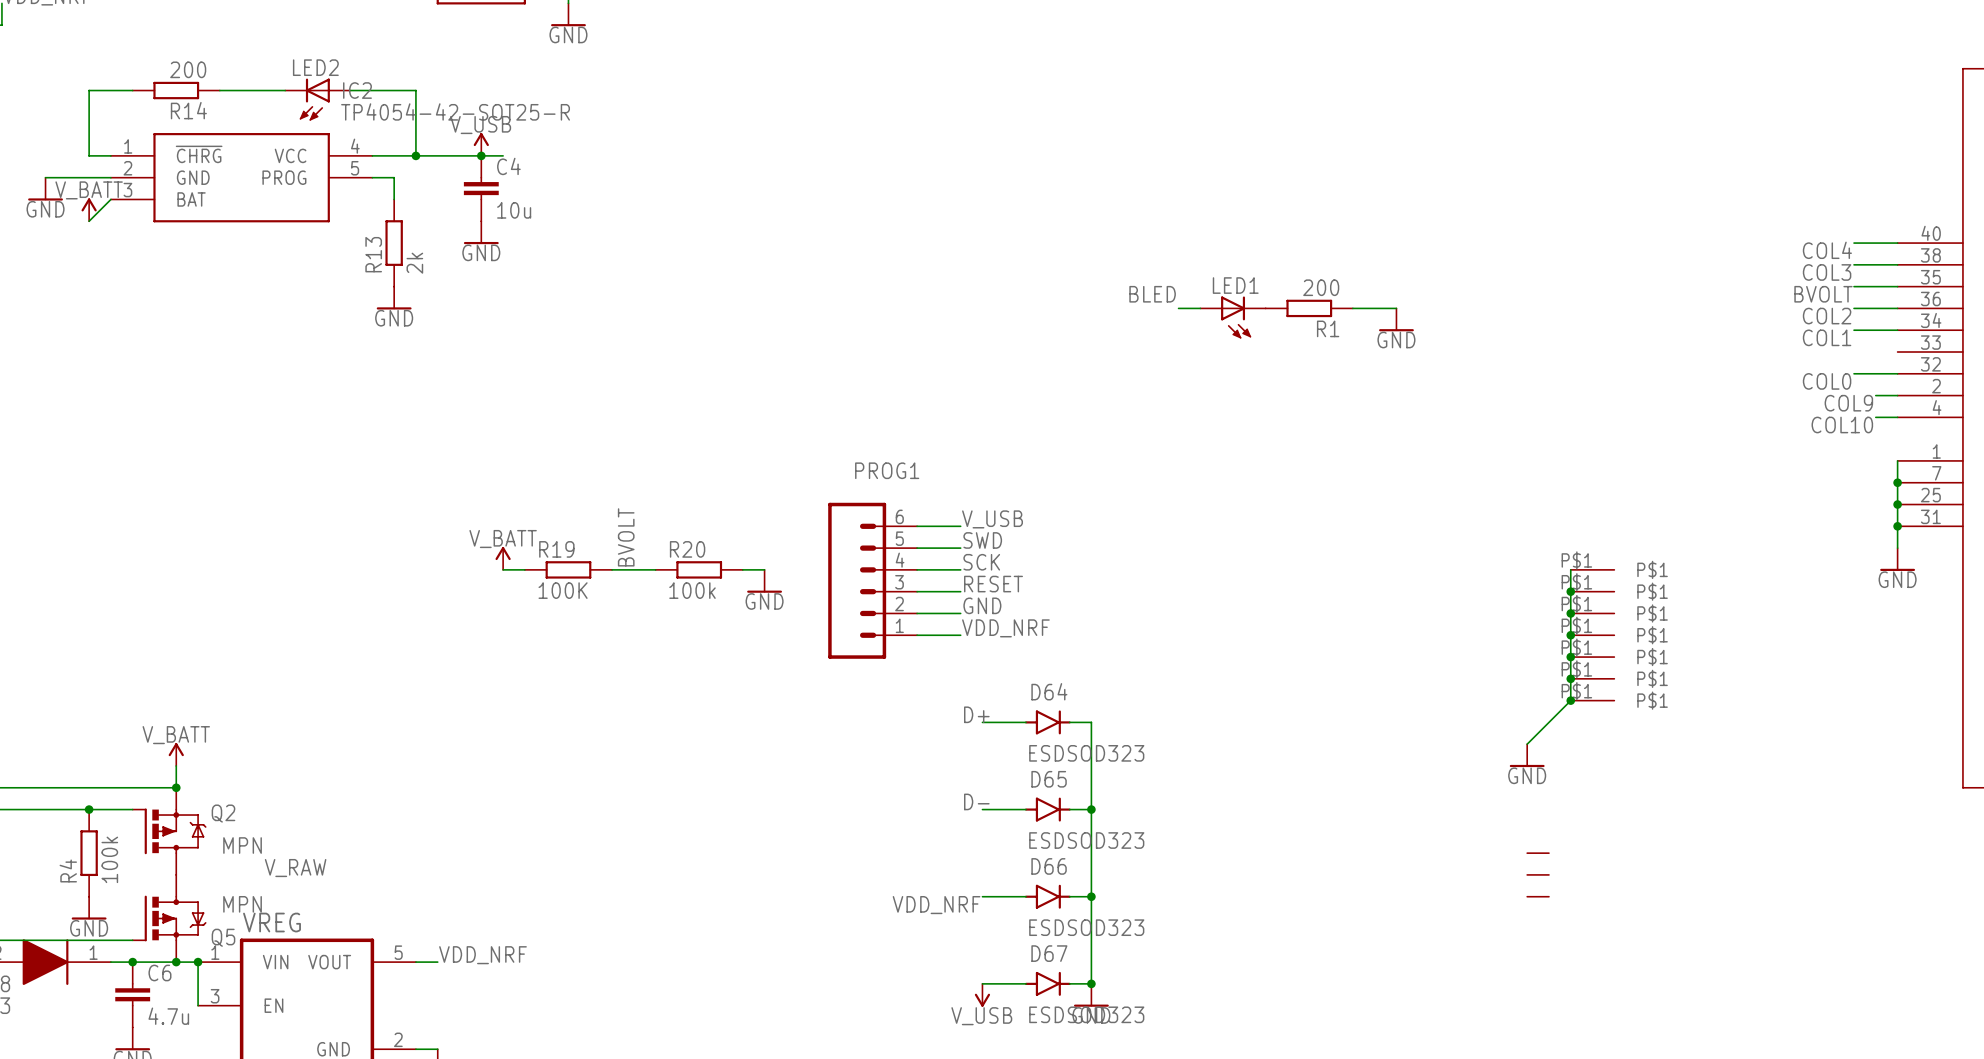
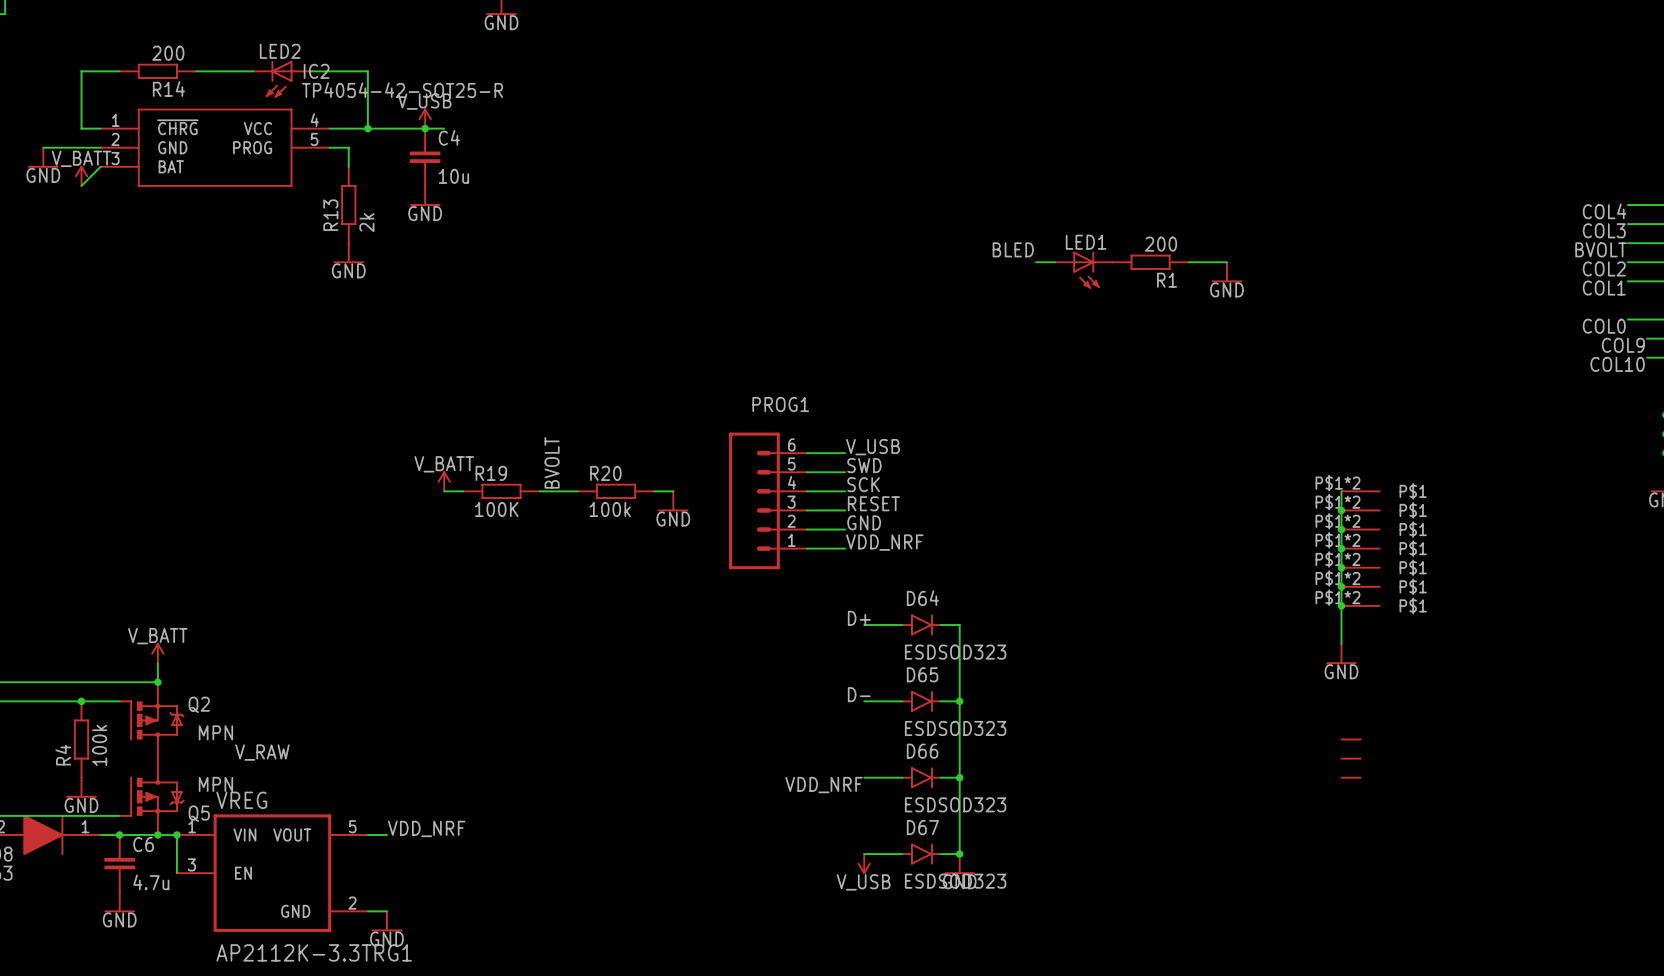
part: none -> (1360, 491)
wire: (1570, 569) (1570, 700) (1527, 744) -> (1341, 491) (1341, 644)
part: (1592, 569) -> none
junction: none -> (1341, 510)
part: none -> (1360, 510)
junction: (1570, 591) -> none
part: (1592, 591) -> none
junction: none -> (1341, 529)
part: none -> (1360, 529)
junction: (1570, 613) -> none
part: (1592, 613) -> none
junction: none -> (1341, 548)
part: none -> (1360, 548)
junction: (1570, 635) -> none
part: (1592, 635) -> none
junction: none -> (1341, 567)
part: none -> (1360, 567)
junction: (1570, 657) -> none
part: (1592, 657) -> none
junction: none -> (1341, 586)
part: none -> (1360, 586)
junction: (1570, 678) -> none
part: (1592, 678) -> none
junction: none -> (1341, 605)
part: none -> (1360, 605)
junction: (1570, 700) -> none
part: (1592, 700) -> none

